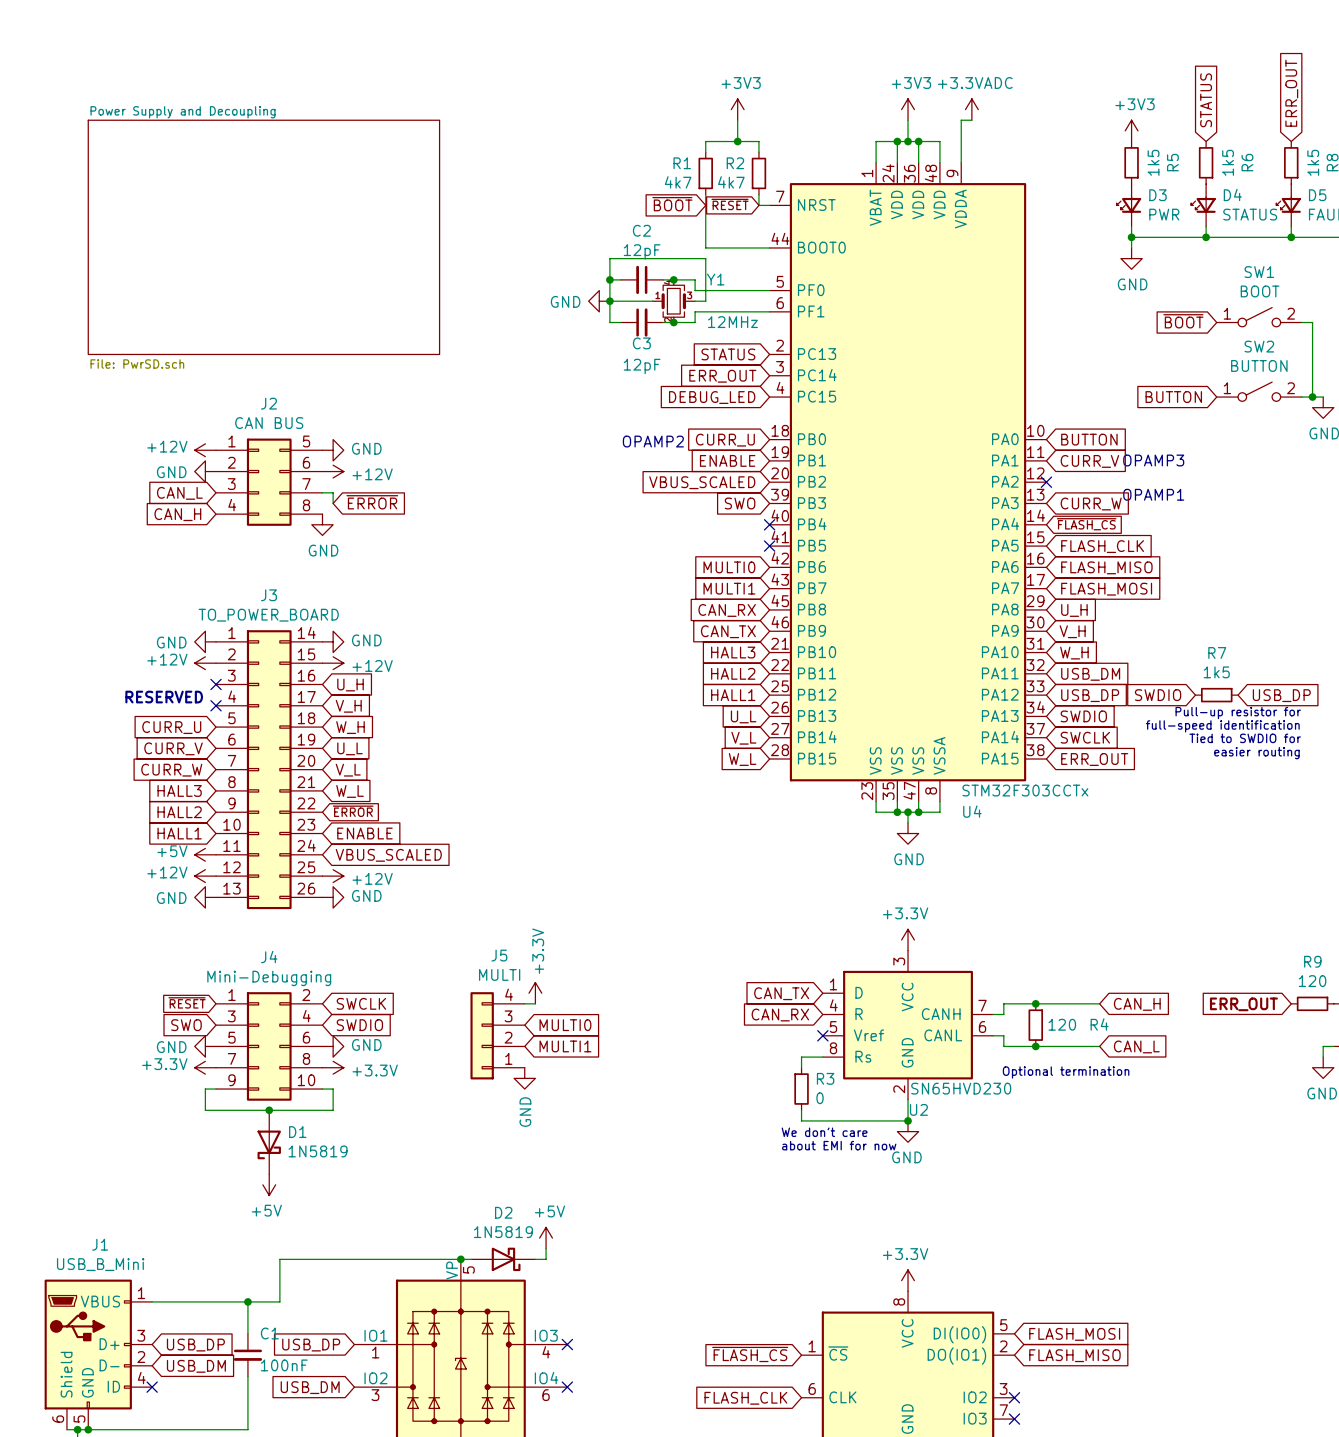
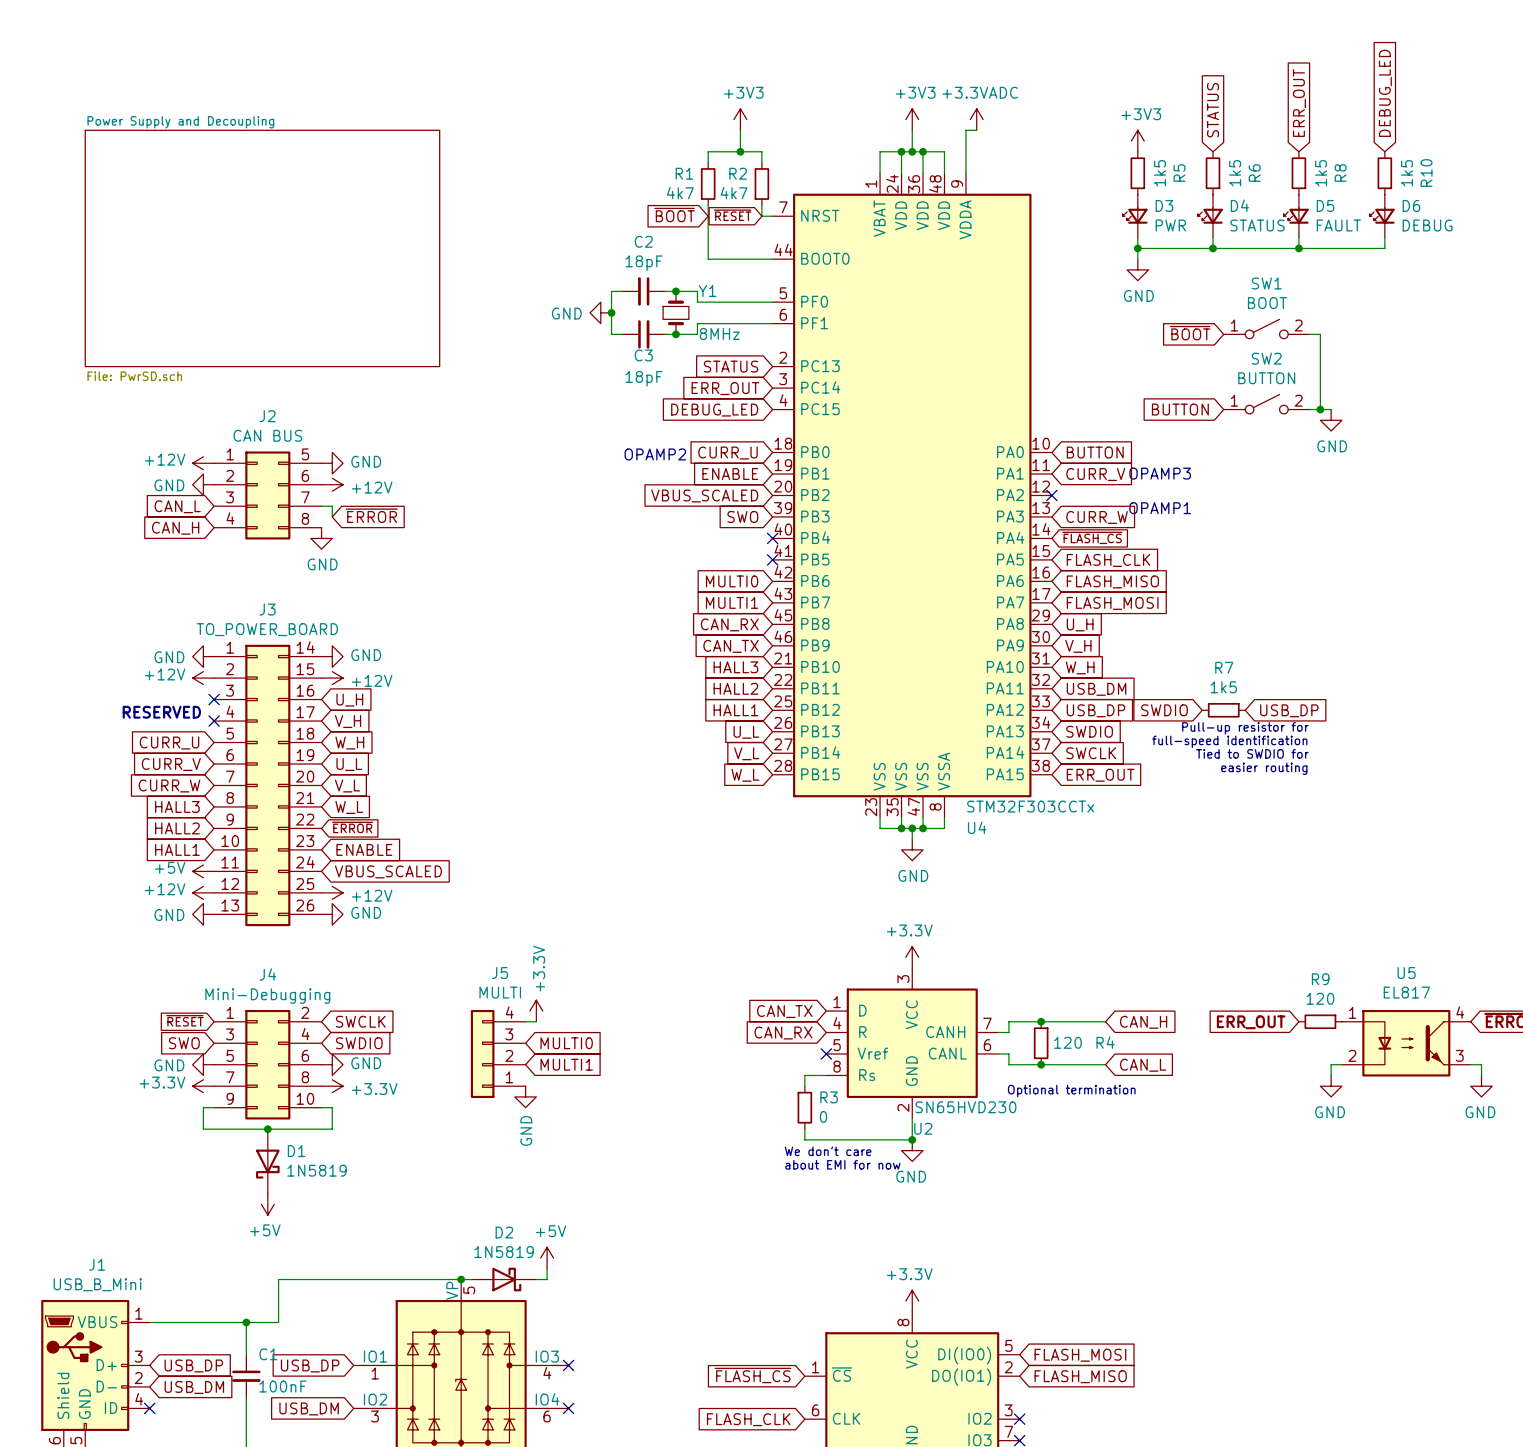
C2 value: 12pF (642, 251) -> 18pF (644, 263)
wire: (609, 279) (609, 258) (705, 258) (705, 301) (695, 301) -> none
junction: (609, 279) -> none
Y1 symbol: [652, 279, 696, 323] -> [663, 291, 689, 335]
wire: (609, 301) (652, 301) -> none
Y1 value: 12MHz (732, 322) -> 8MHz (719, 333)
C3 value: 12pF (642, 366) -> 18pF (644, 378)

